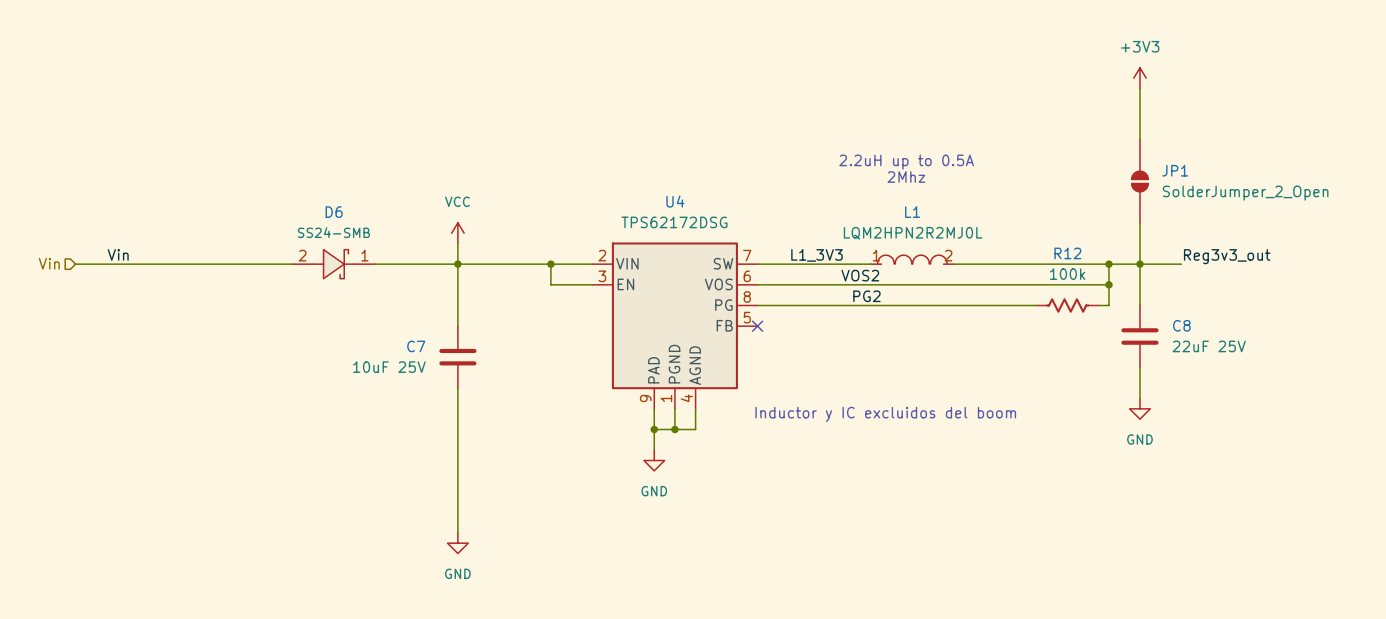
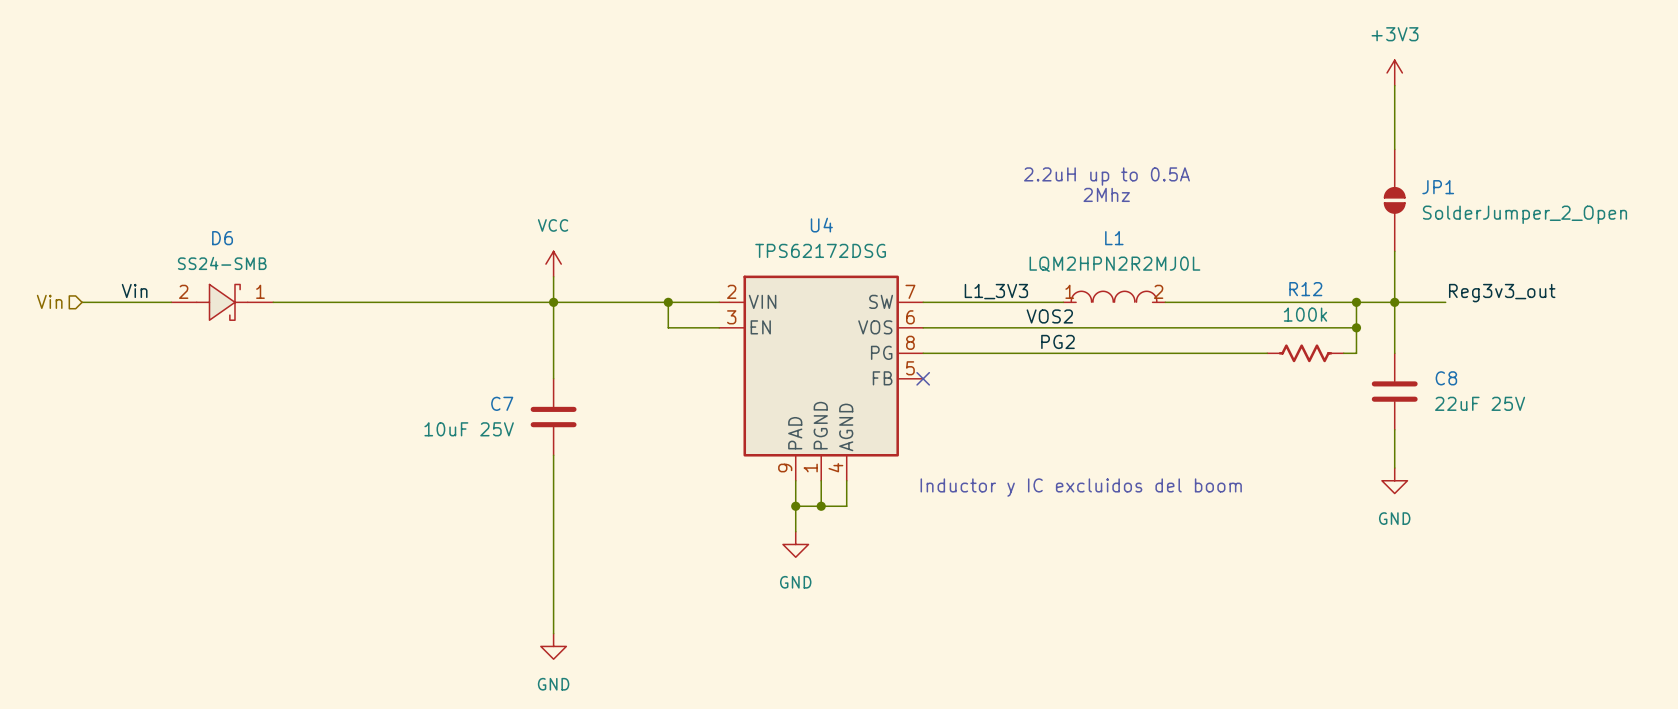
D6 position: (333, 264) -> (222, 302)

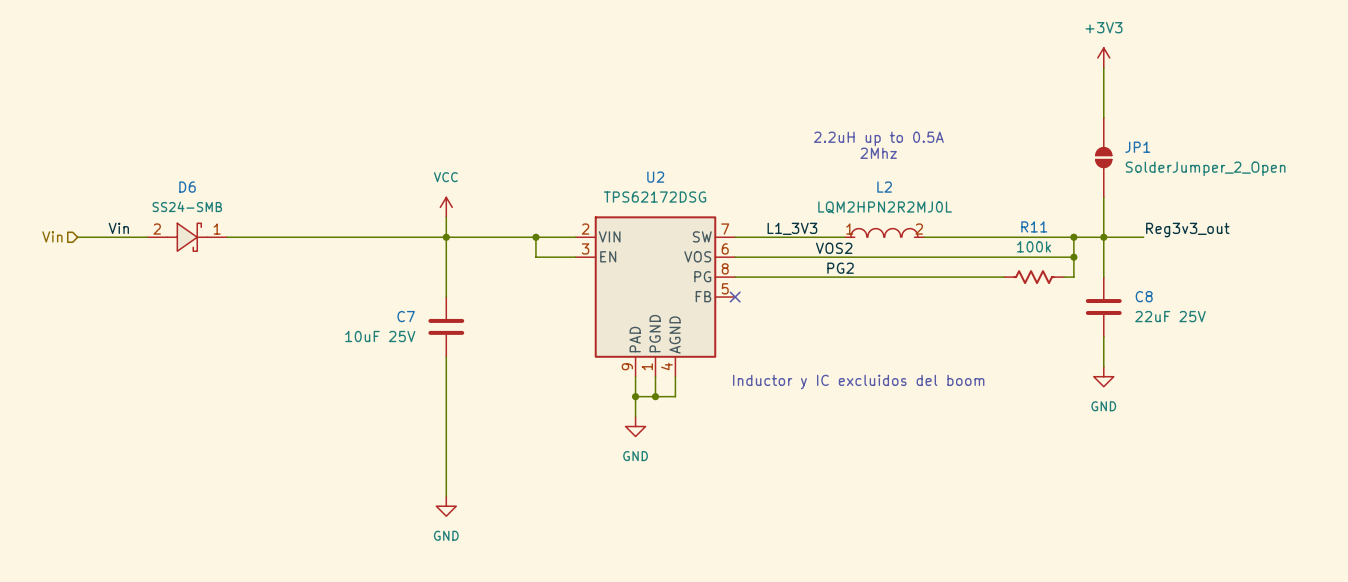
U4 name: U4 (821, 225) -> U2 (655, 177)
L1 name: L1 (1114, 238) -> L2 (884, 187)
R12 name: R12 (1305, 289) -> R11 (1034, 226)

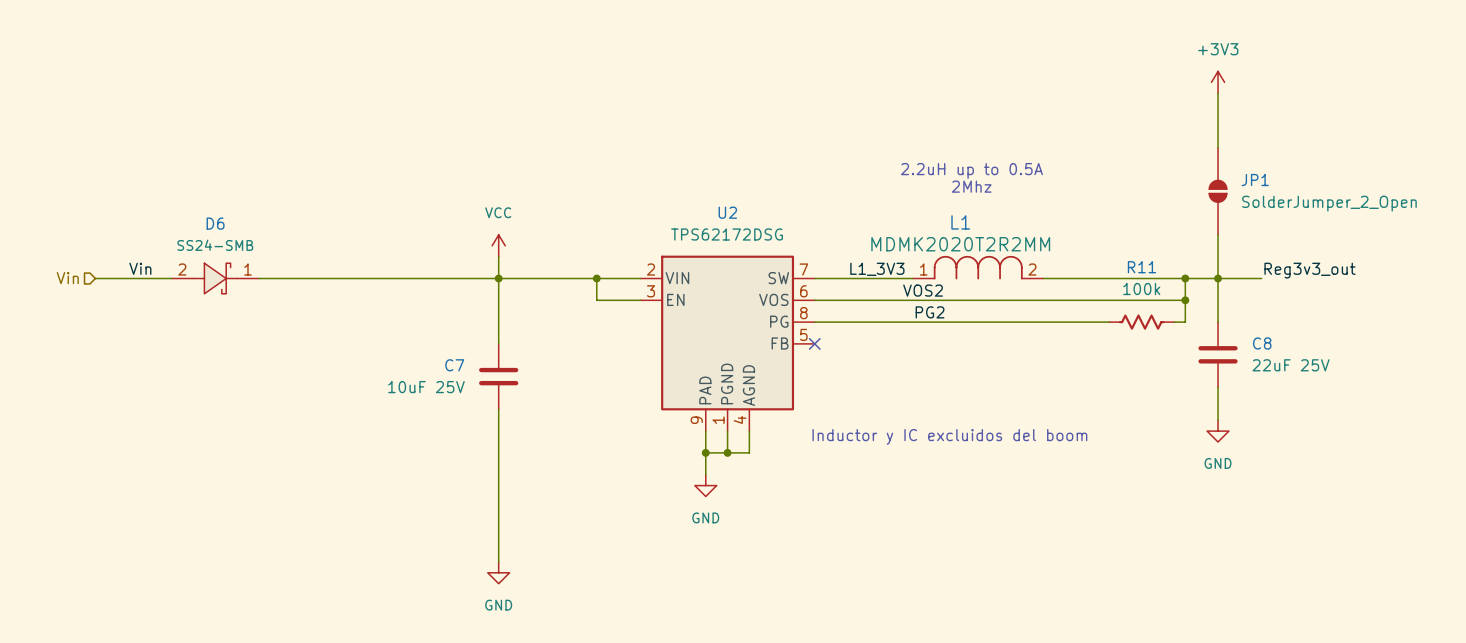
L1: none -> MDMK2020T2R2MM (978, 267)
L2: LQM2HPN2R2MJ0L (884, 232) -> none

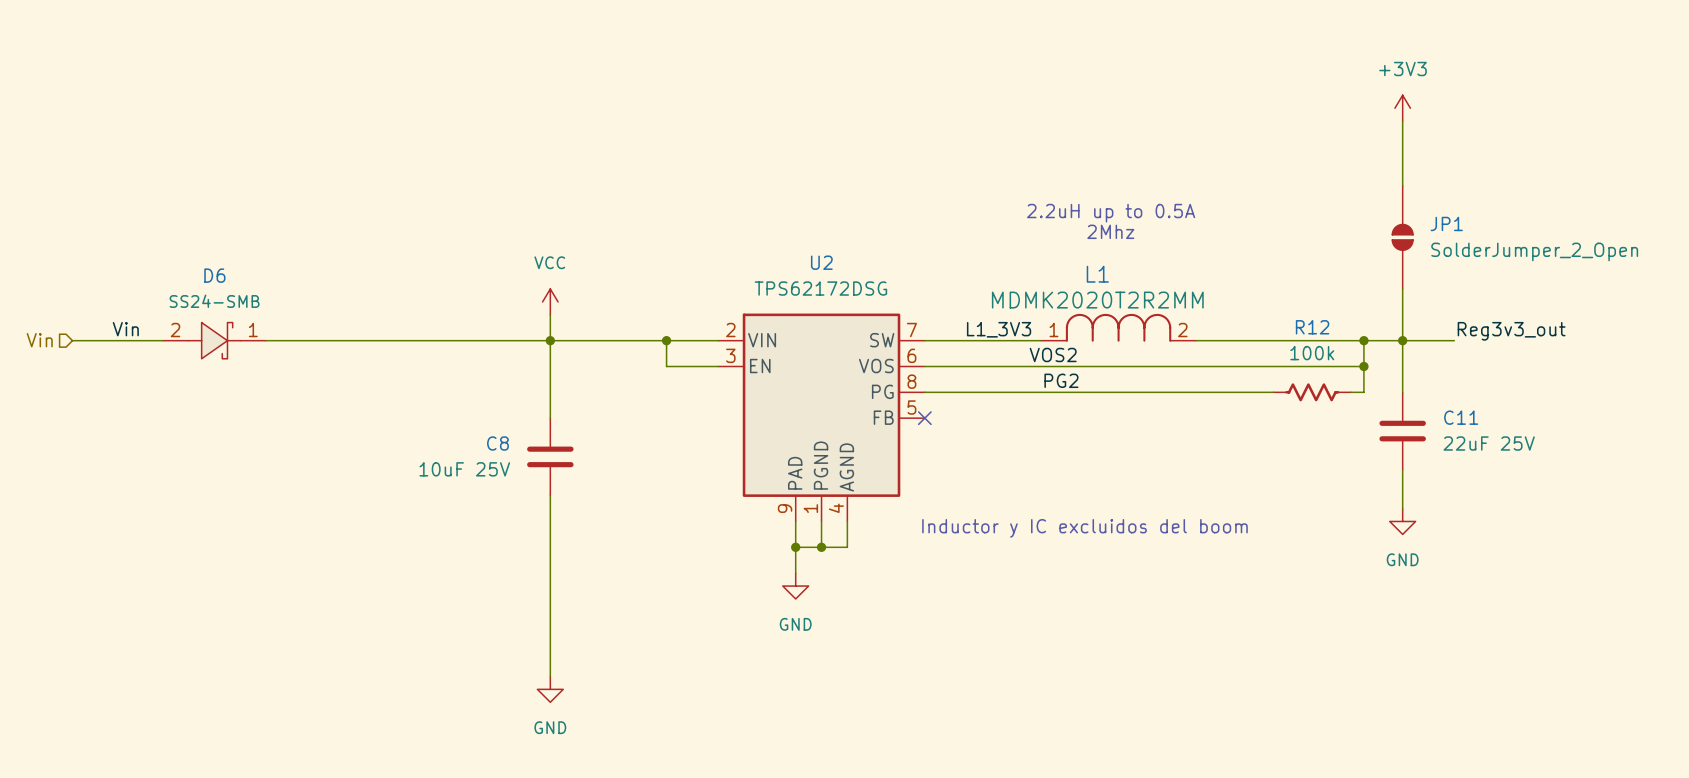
R11 name: R11 (1141, 267) -> R12 (1312, 327)
C8 name: C8 (1262, 343) -> C11 (1461, 417)
C7 name: C7 (454, 365) -> C8 (497, 443)

